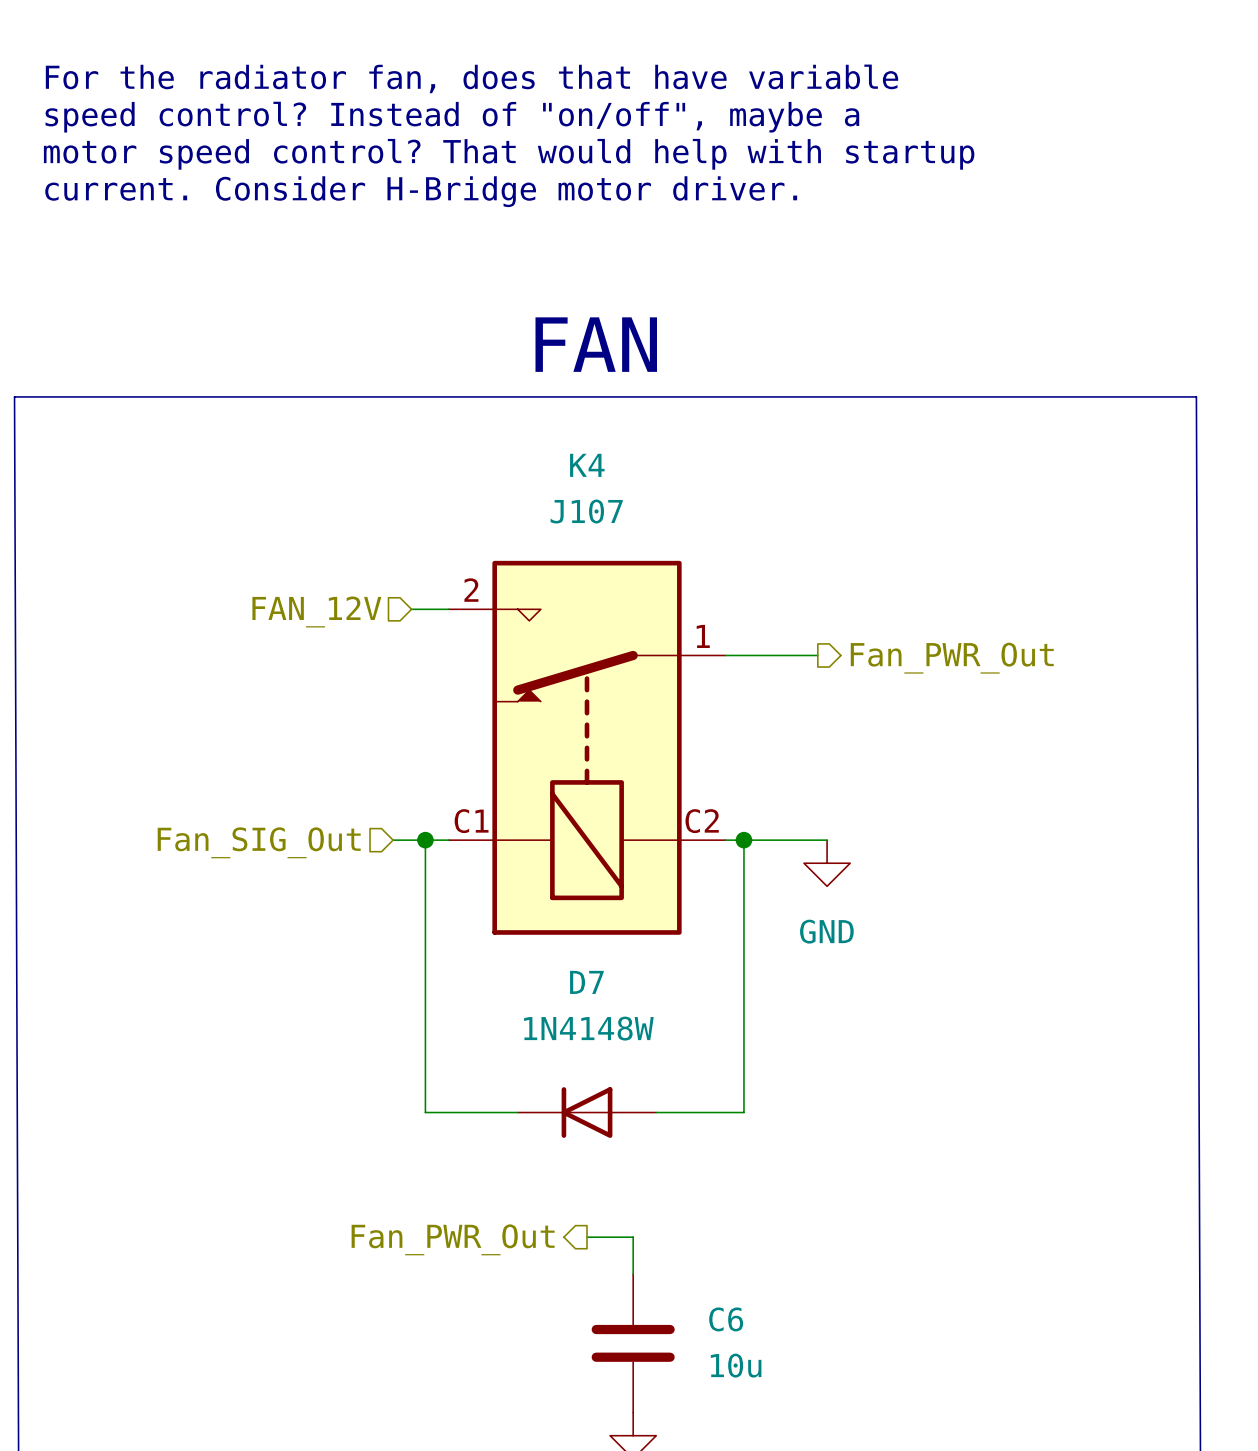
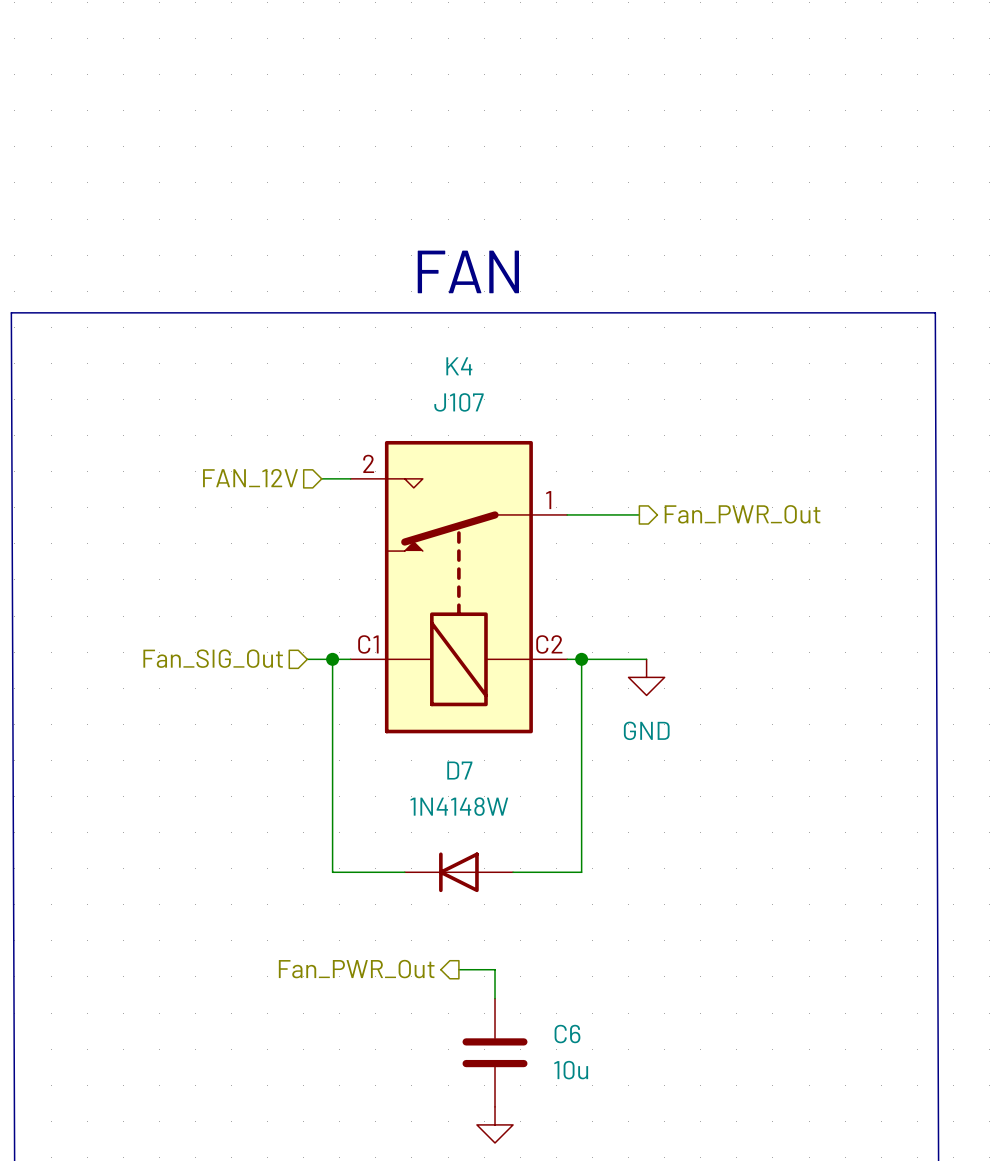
text: For the radiator fan, does that have variable (471, 78) -> none
text: speed control? Instead of "on/off", maybe a (452, 117) -> none
text: motor speed control? That would help with startup (509, 154) -> none
text: current. Consider H-Bridge motor driver. (421, 191) -> none

